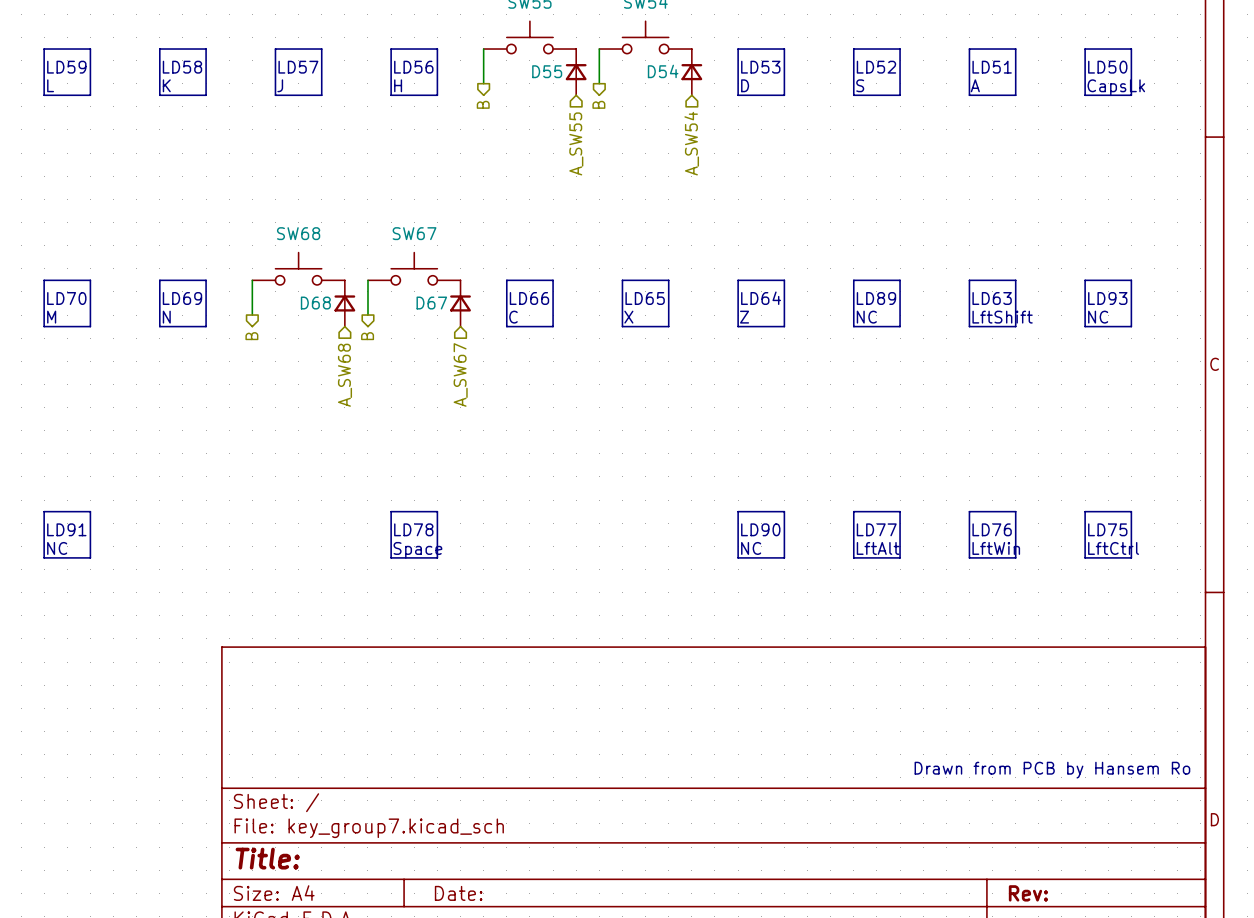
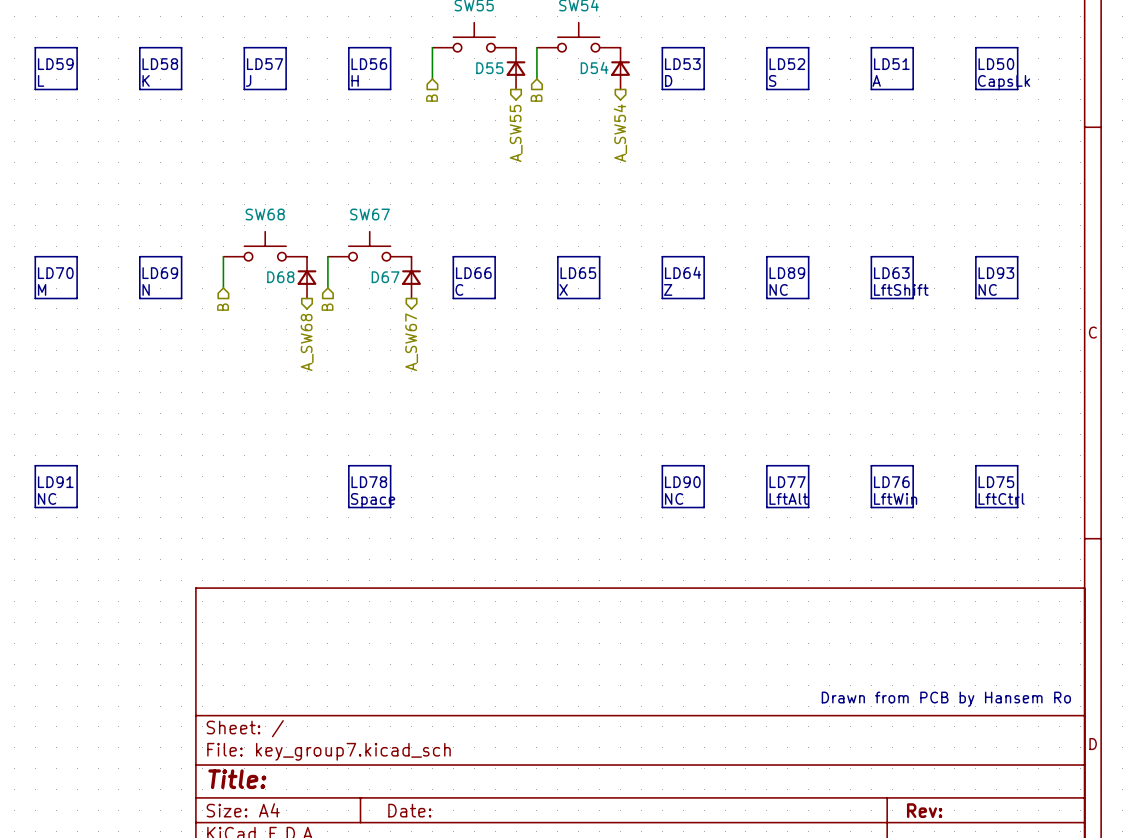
hierarchical label shape: output (483, 104) -> input (432, 98)
hierarchical label shape: output (598, 104) -> input (536, 98)
hierarchical label shape: input (576, 143) -> output (516, 133)
hierarchical label shape: input (691, 143) -> output (620, 133)
hierarchical label shape: output (251, 336) -> input (223, 307)
hierarchical label shape: output (367, 336) -> input (327, 307)
hierarchical label shape: input (460, 374) -> output (411, 342)
hierarchical label shape: input (344, 375) -> output (307, 342)

